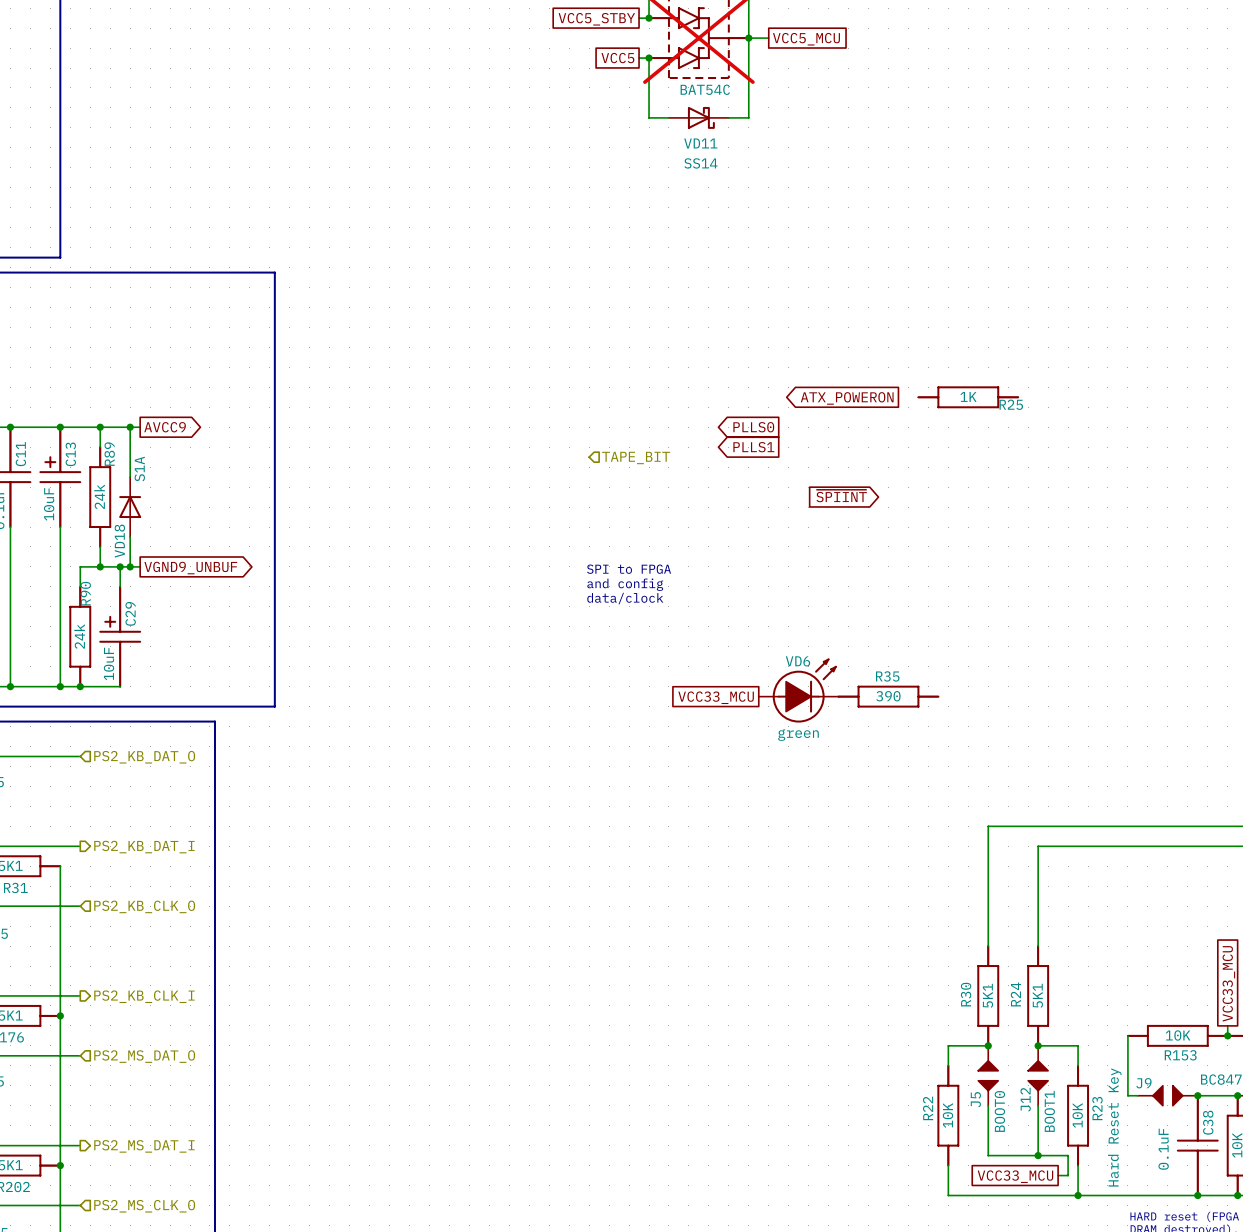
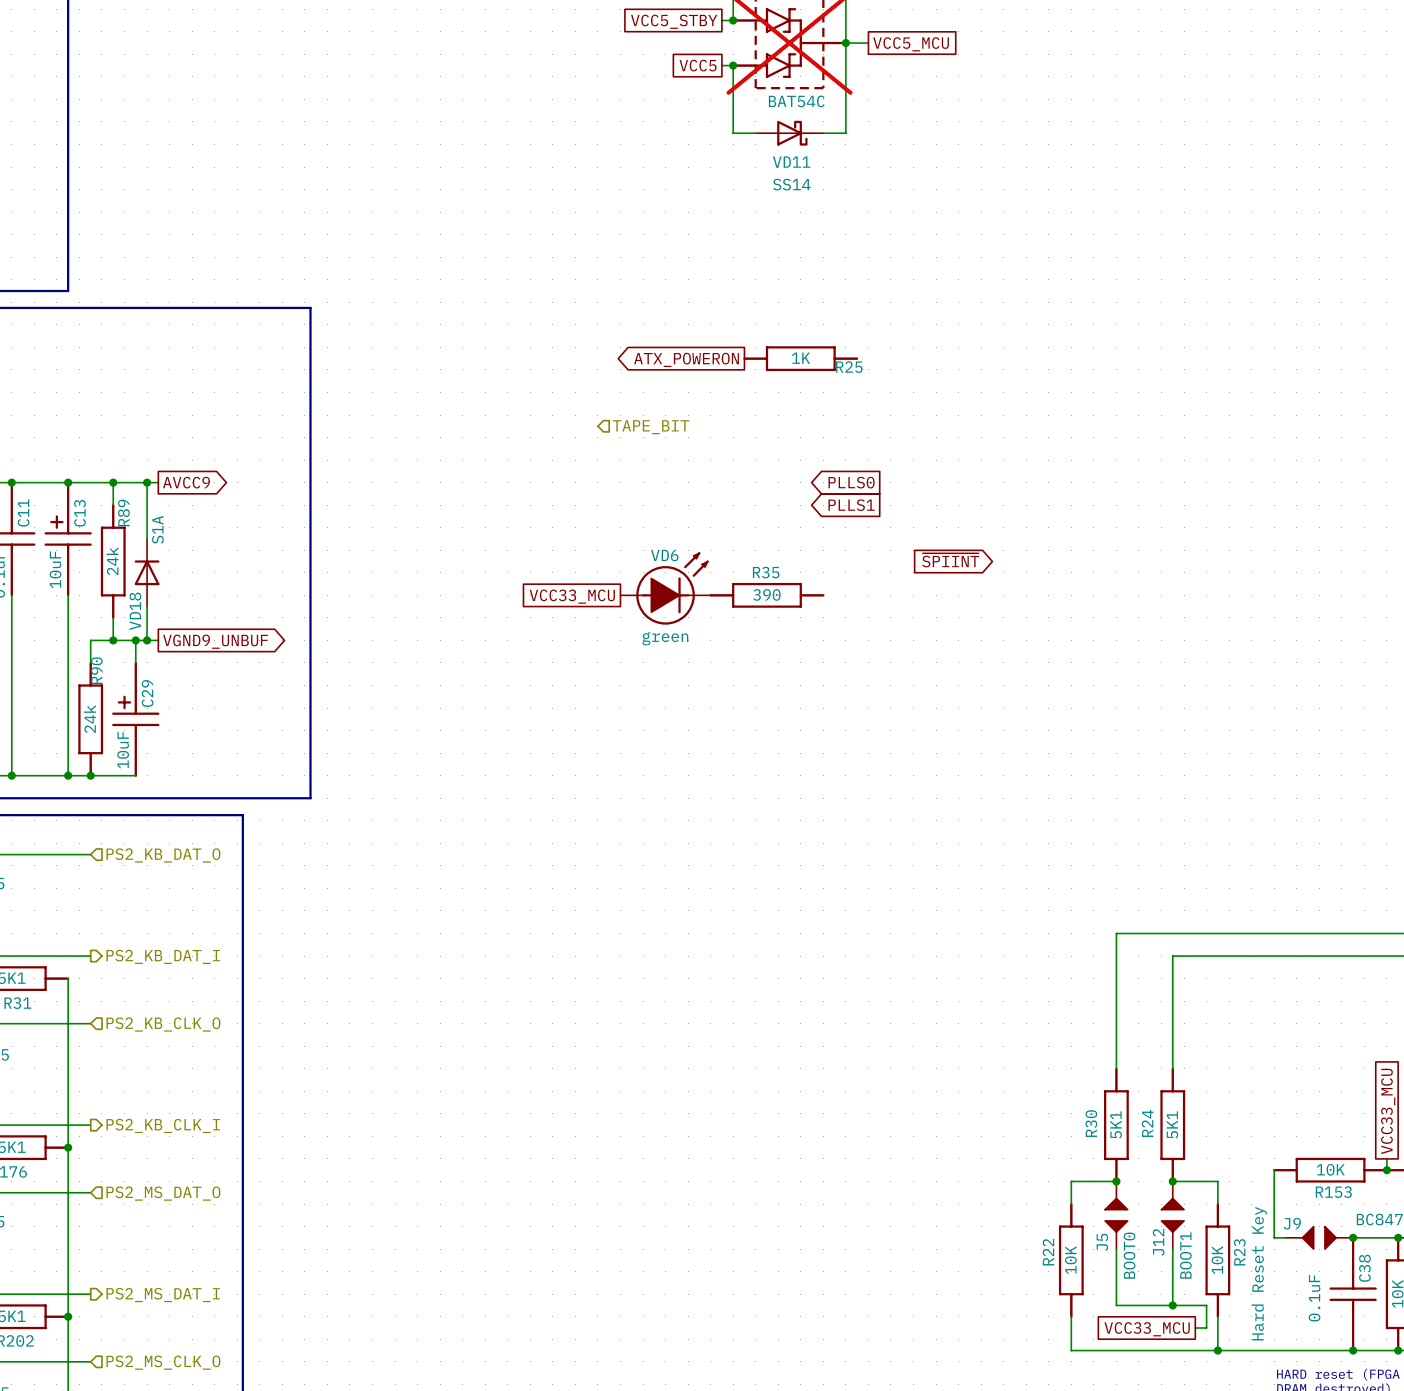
global label: none -> ATX_POWERON (686, 359)
R25 position: (968, 397) -> (800, 358)
global label: ATX_POWERON (847, 398) -> none
hierarchical label position: TAPE_BIT (636, 458) -> TAPE_BIT (650, 427)
global label: none -> VCC33_MCU (572, 596)
text: SPI to FPGA (629, 569) -> none
text: and config (625, 584) -> none
text: data/clock (625, 598) -> none
VD6 position: (798, 690) -> (665, 588)
R35 position: (888, 696) -> (766, 595)
global label: VCC33_MCU (716, 697) -> none

